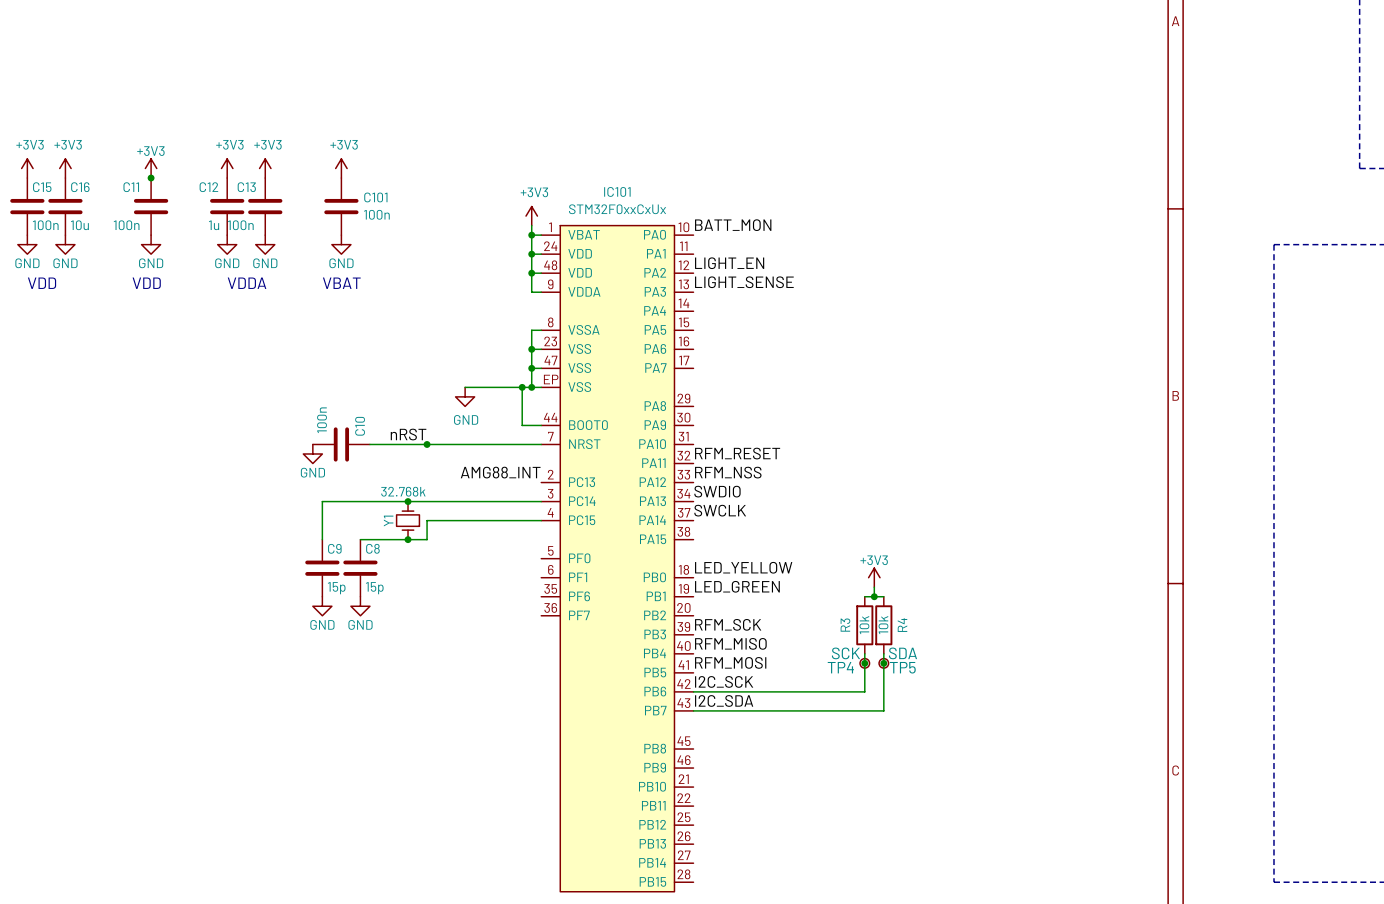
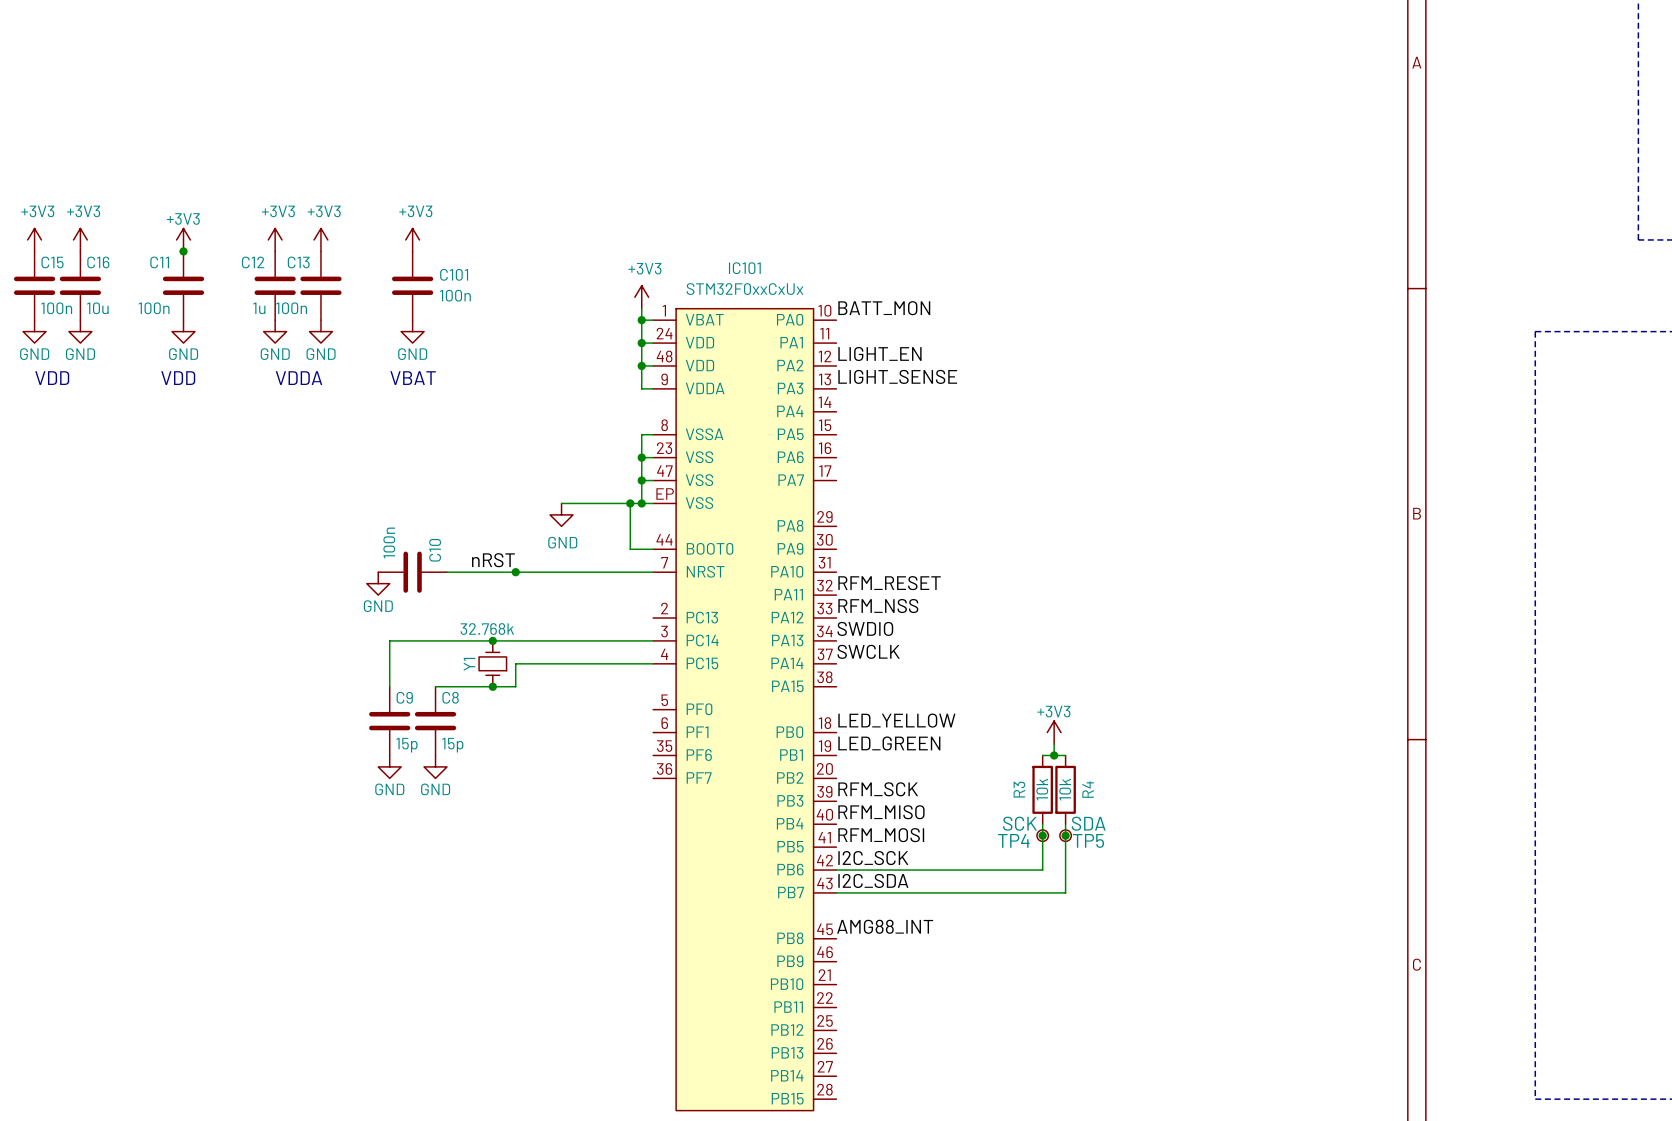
label: AMG88_INT (500, 472) -> none
label: none -> AMG88_INT (885, 926)

